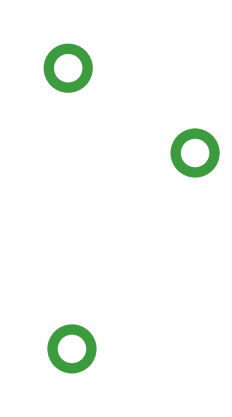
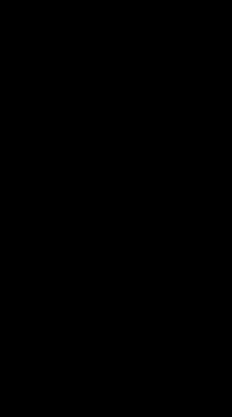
part: (68, 68) -> none
part: (195, 153) -> none
part: (71, 348) -> none

